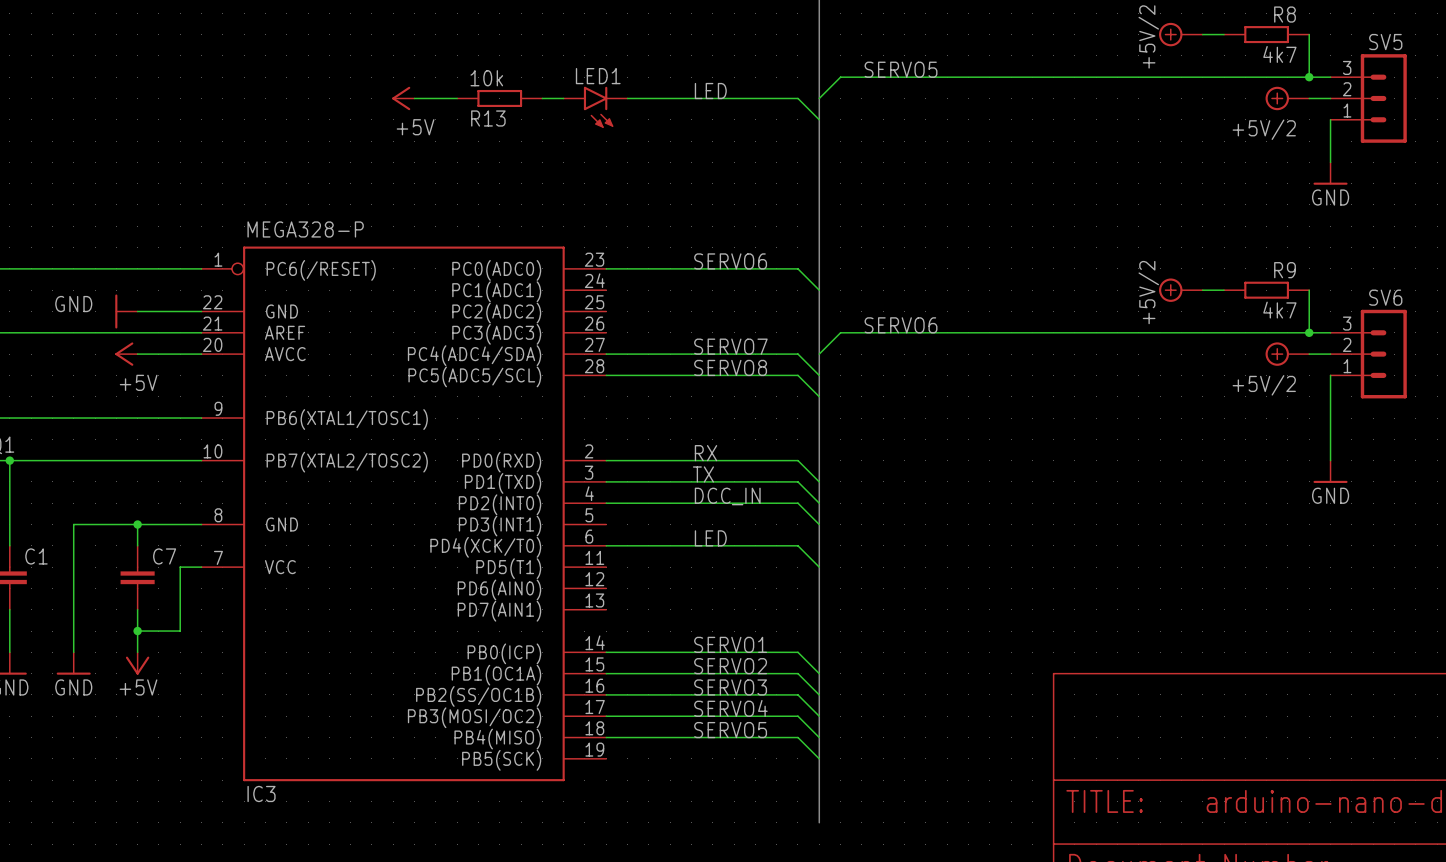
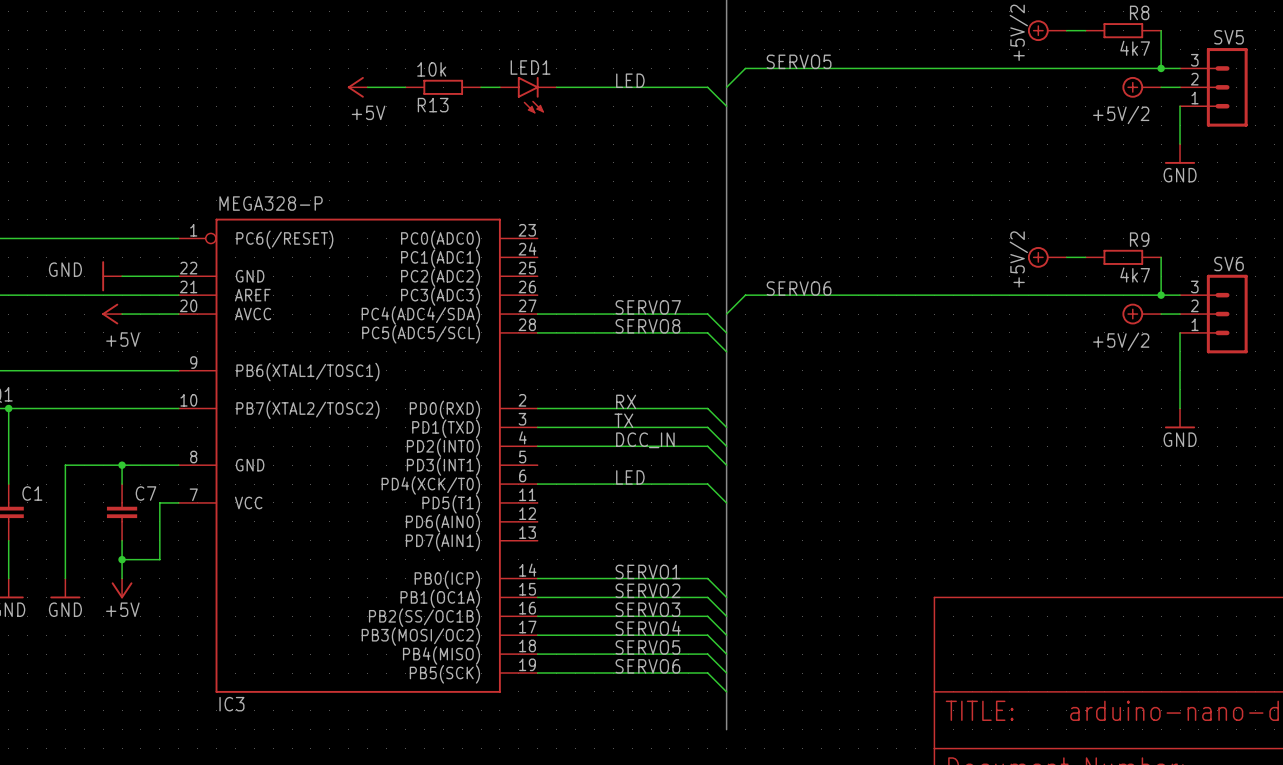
label: SERVO6 (730, 261) -> none
wire: (606, 268) (797, 268) (819, 290) -> none
label: none -> SERVO6 (647, 666)
wire: none -> (537, 673) (707, 673) (726, 691)

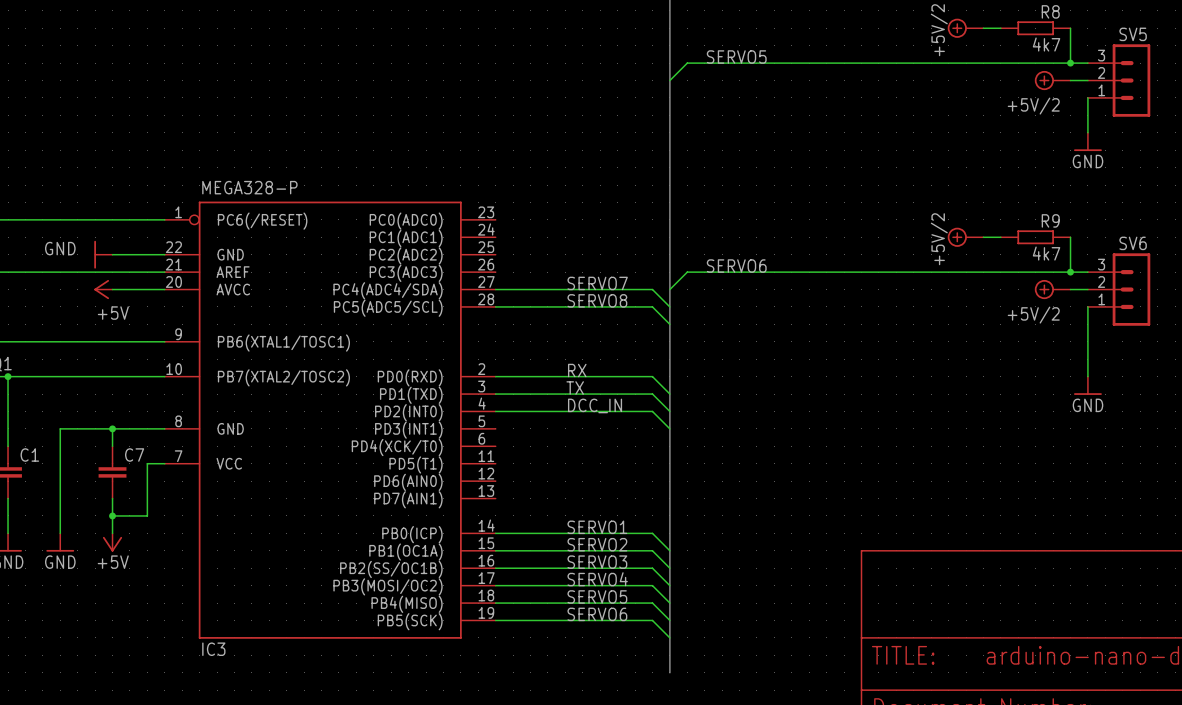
label: LED (630, 80) -> none
power symbol: +5V (357, 87) -> none
wire: (367, 87) (405, 87) -> none
R13: 10k (443, 87) -> none
wire: (481, 87) (499, 87) -> none
wire: (556, 87) (707, 87) (726, 106) -> none
LED1: (528, 95) -> none
label: LED (630, 477) -> none
wire: (537, 484) (707, 484) (726, 502) -> none

